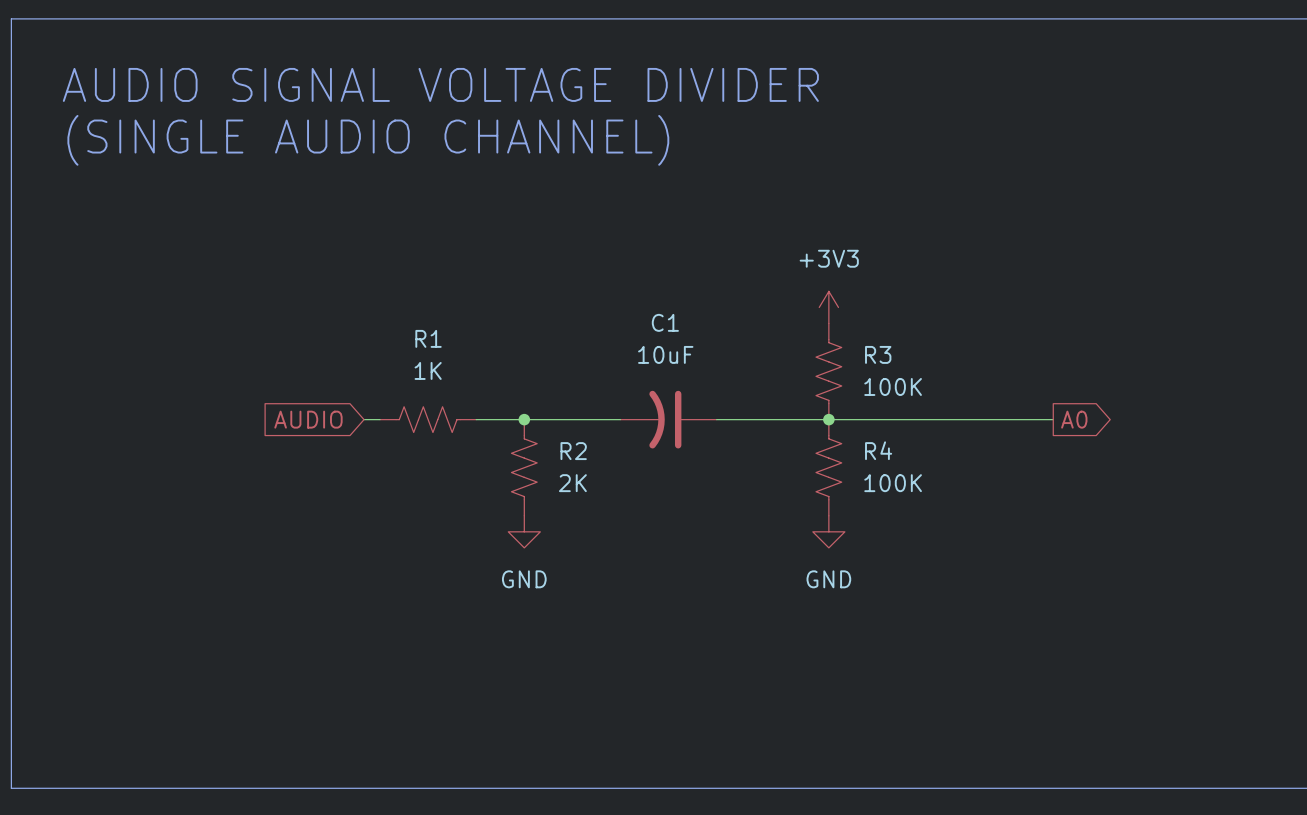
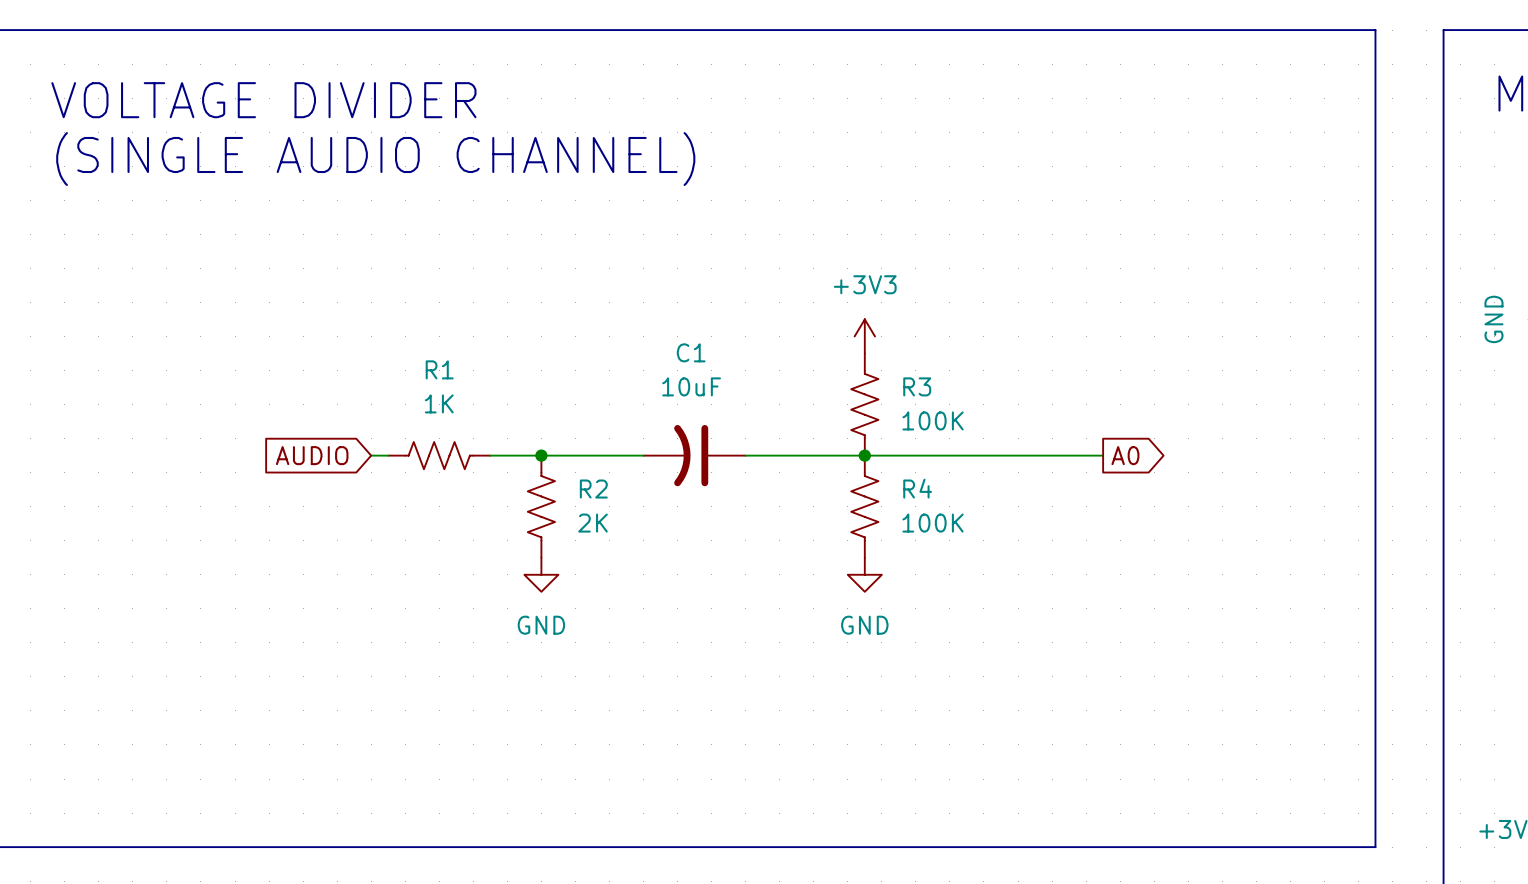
text: AUDIO SIGNAL VOLTAGE DIVIDER (440, 84) -> VOLTAGE DIVIDER (263, 100)

